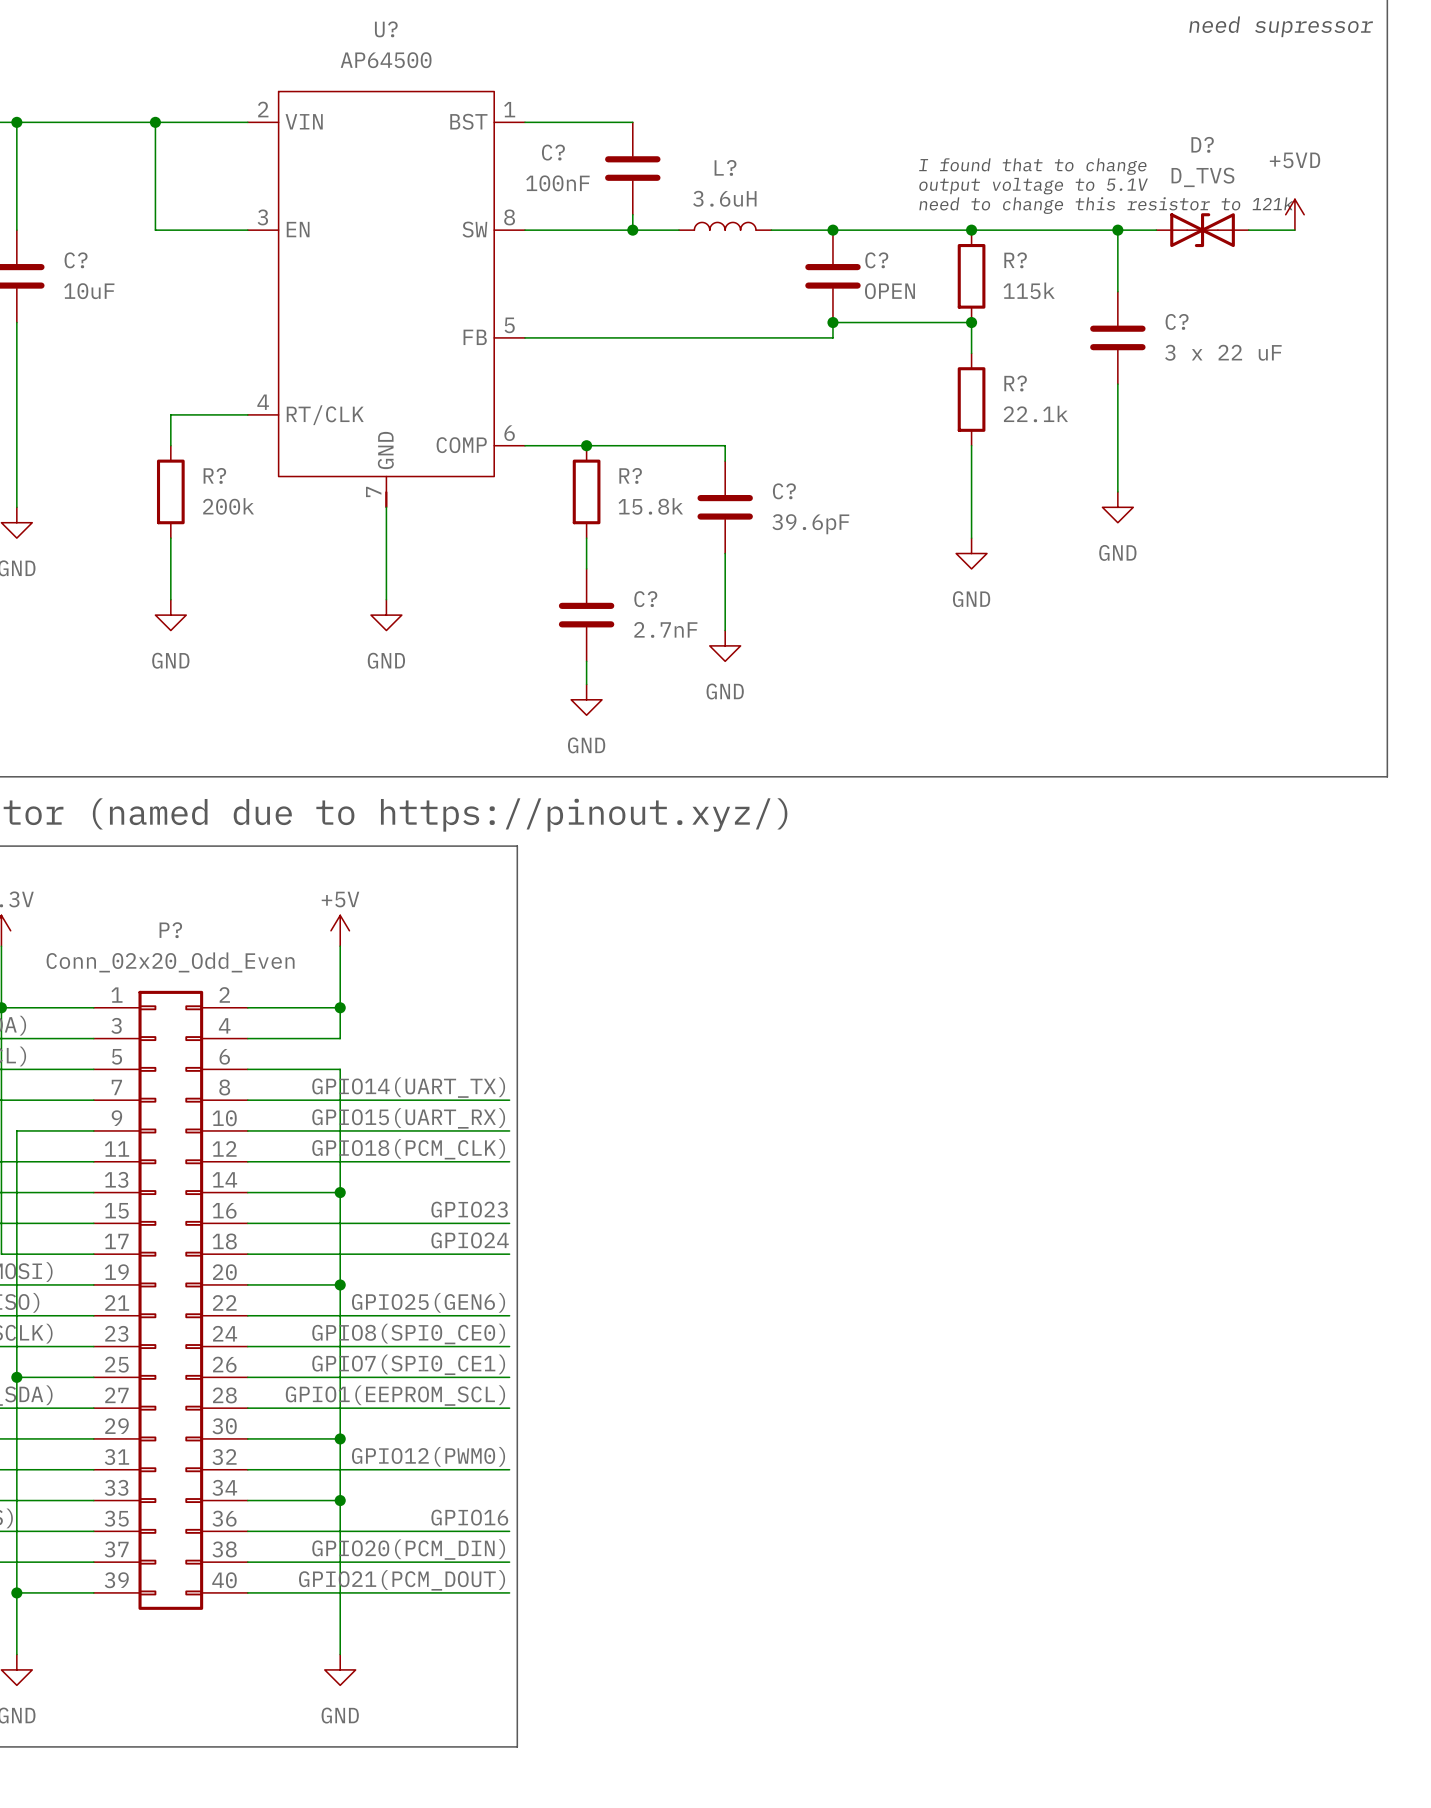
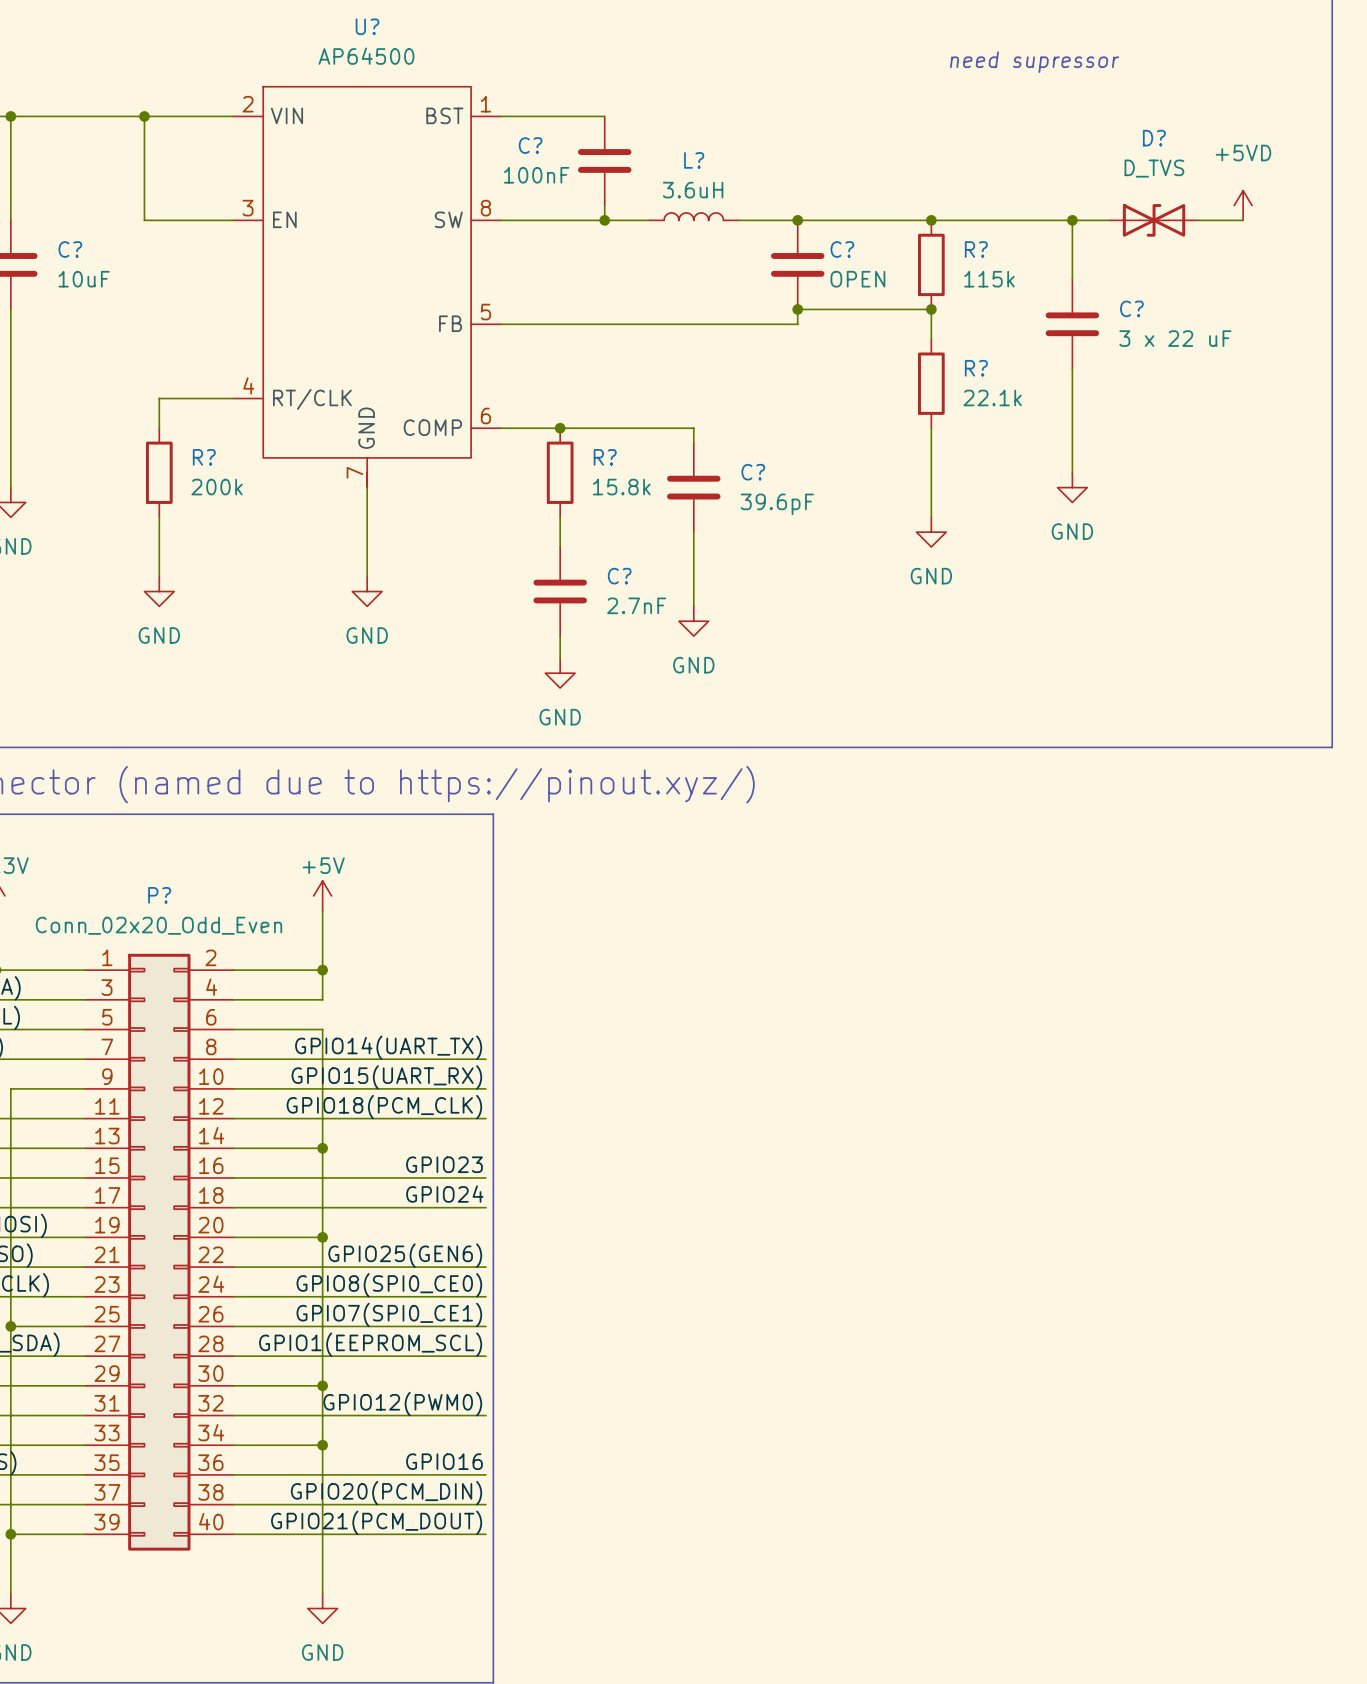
text position: need supressor (1281, 26) -> need supressor (1034, 62)
text: I found that to change (1032, 166) -> none
text: output voltage to 5.1V (1033, 186) -> none
text: need to change this resistor to 121k (1106, 205) -> none

